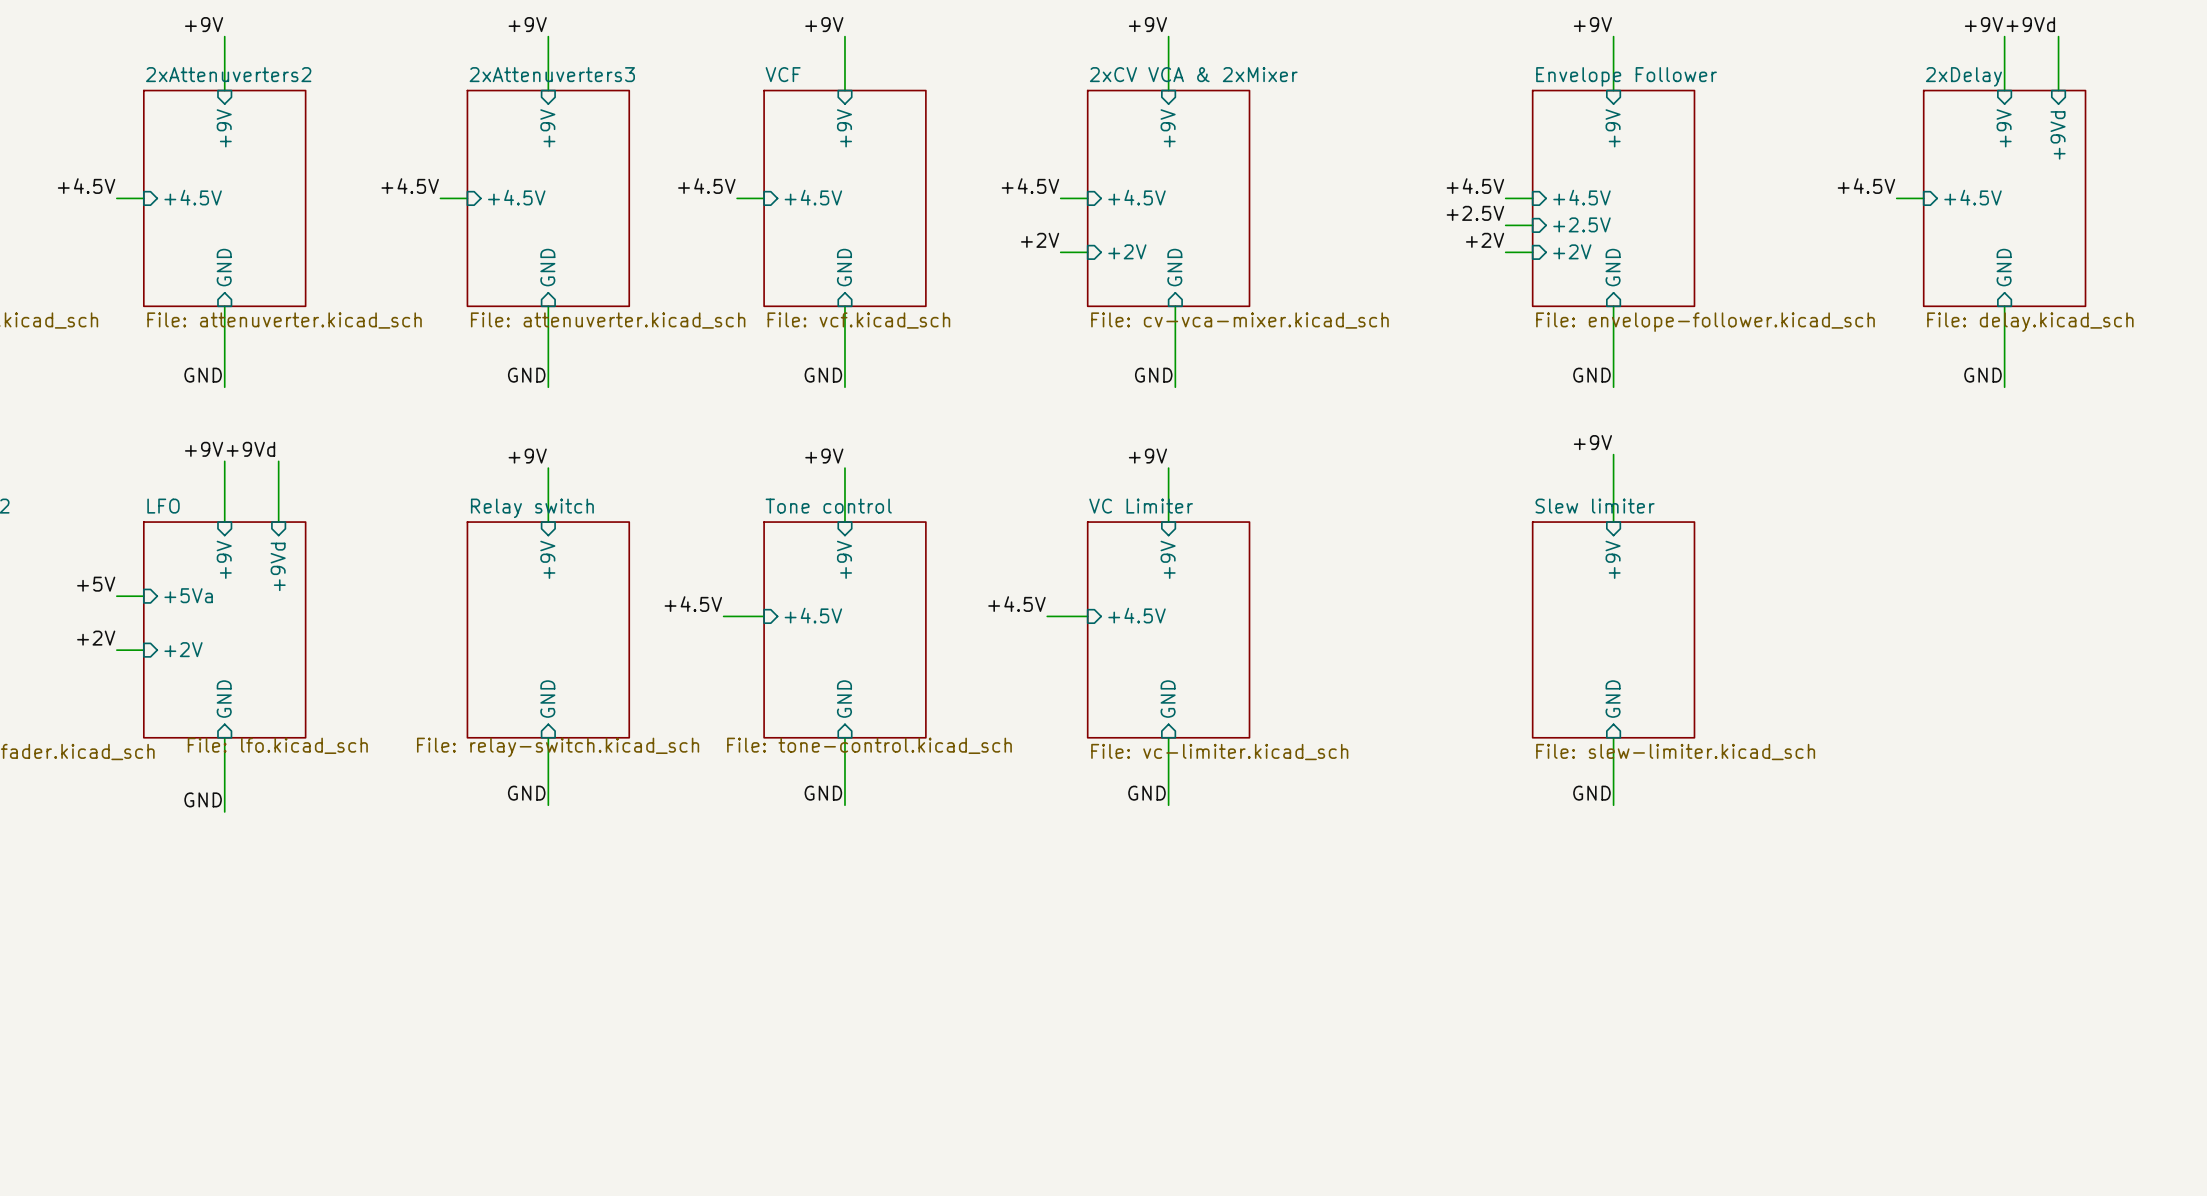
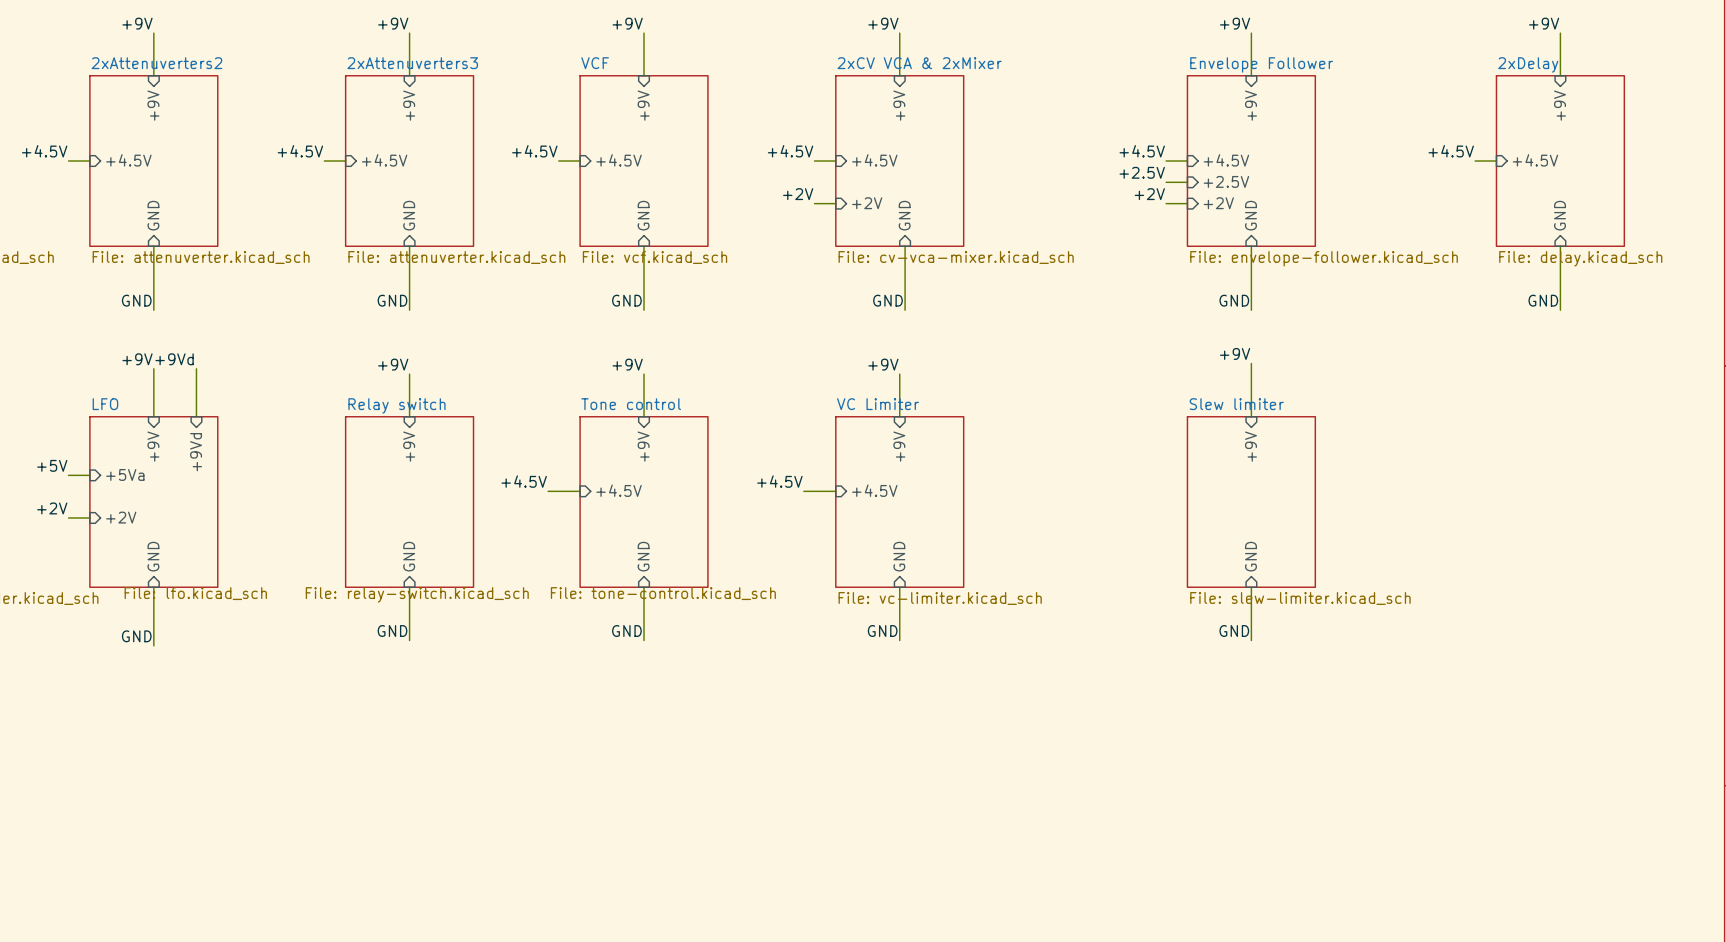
label: +9Vd (2030, 24) -> none
wire: (2058, 36) (2058, 90) -> none
sheet pin: +9Vd (2058, 135) -> none

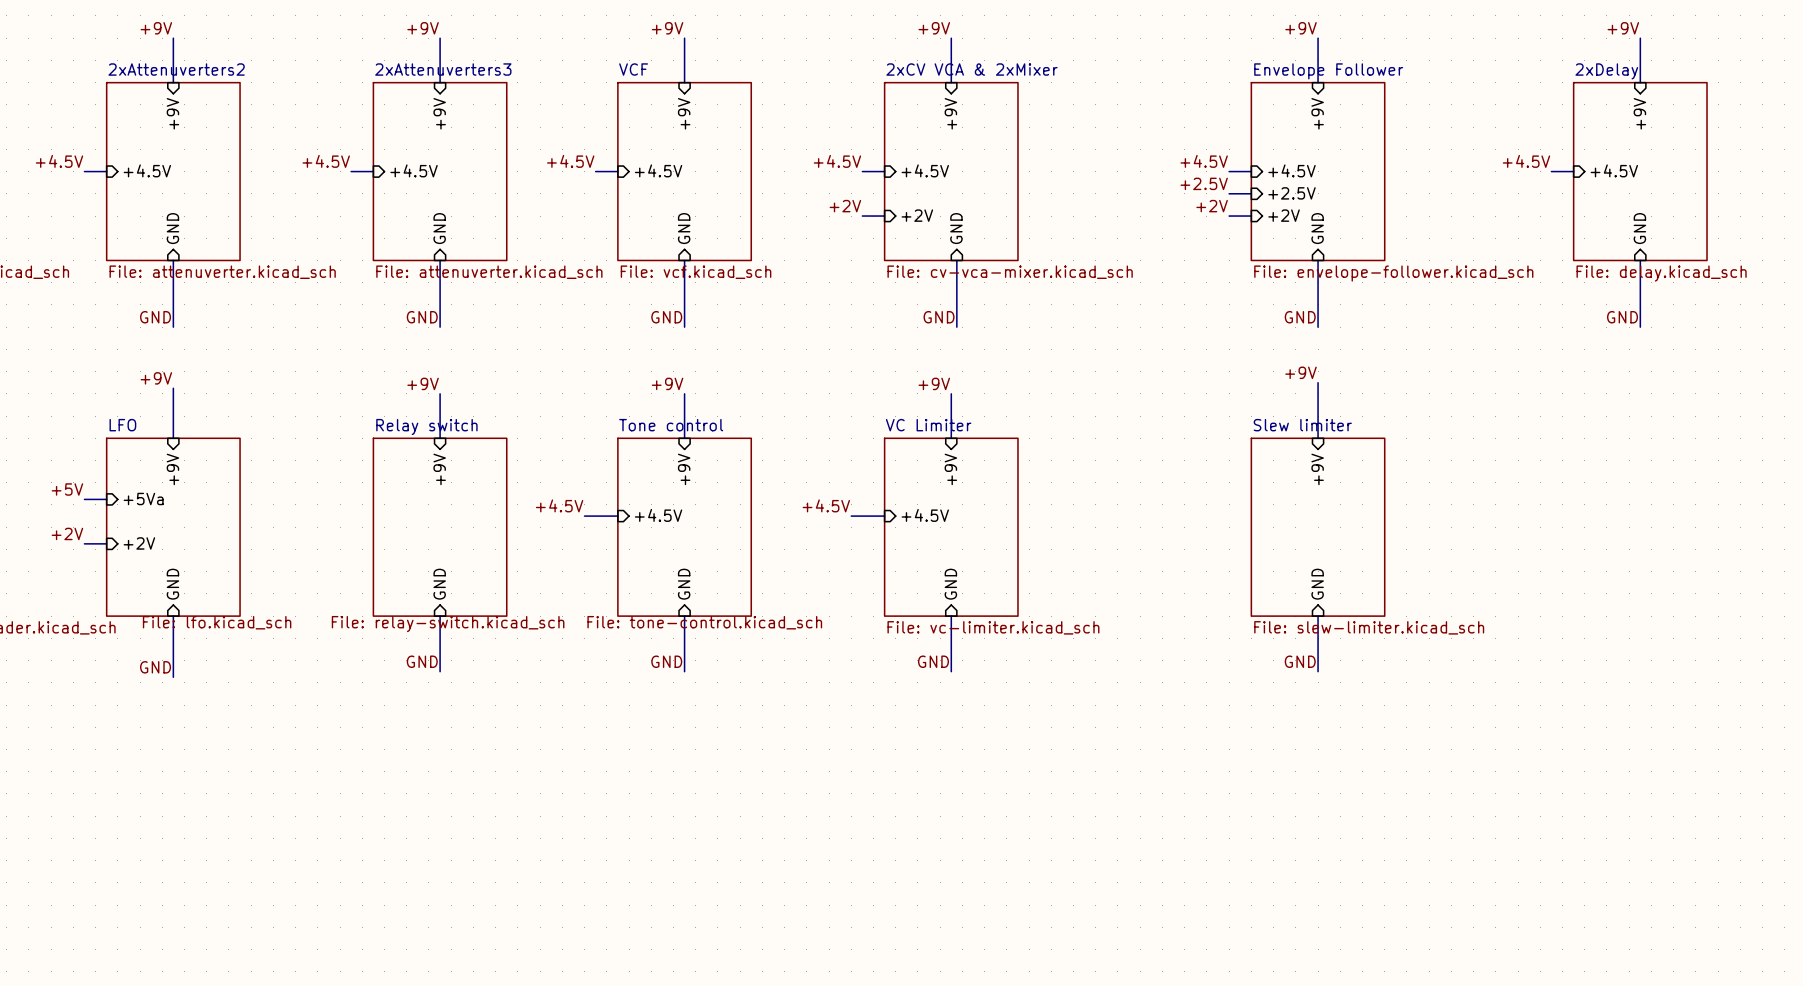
label: +9Vd (174, 359) -> none
wire: (196, 368) (196, 416) -> none
sheet pin: +9Vd (196, 452) -> none

